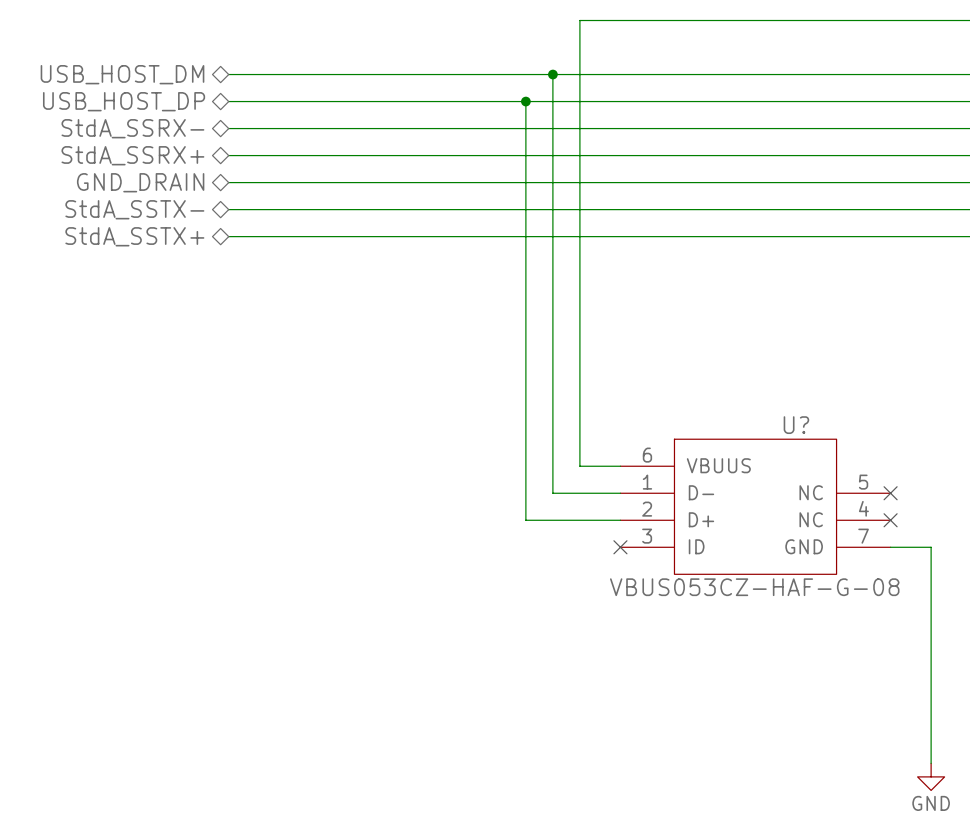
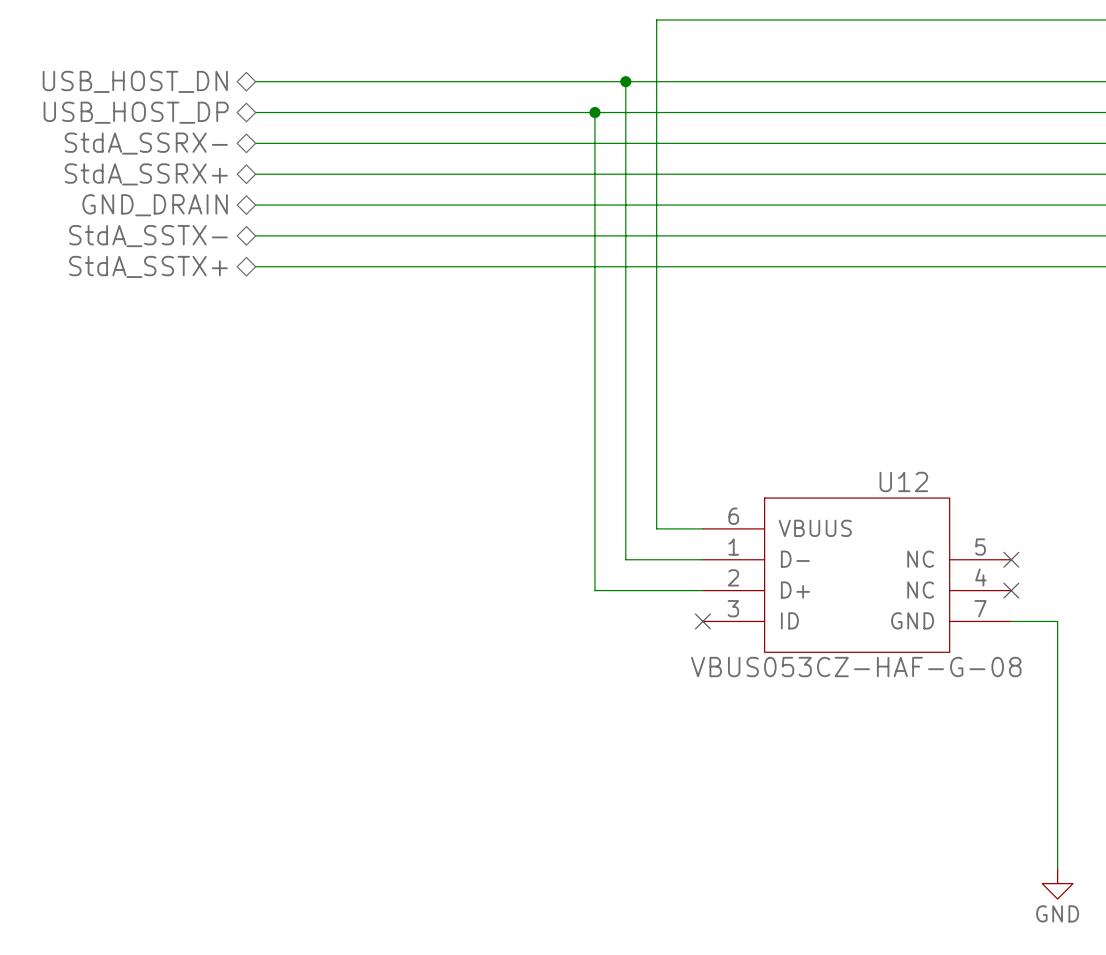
hierarchical label: USB_HOST_DM (122, 74) -> USB_HOST_DN (135, 81)
U? name: U? (796, 425) -> U12 (903, 481)

